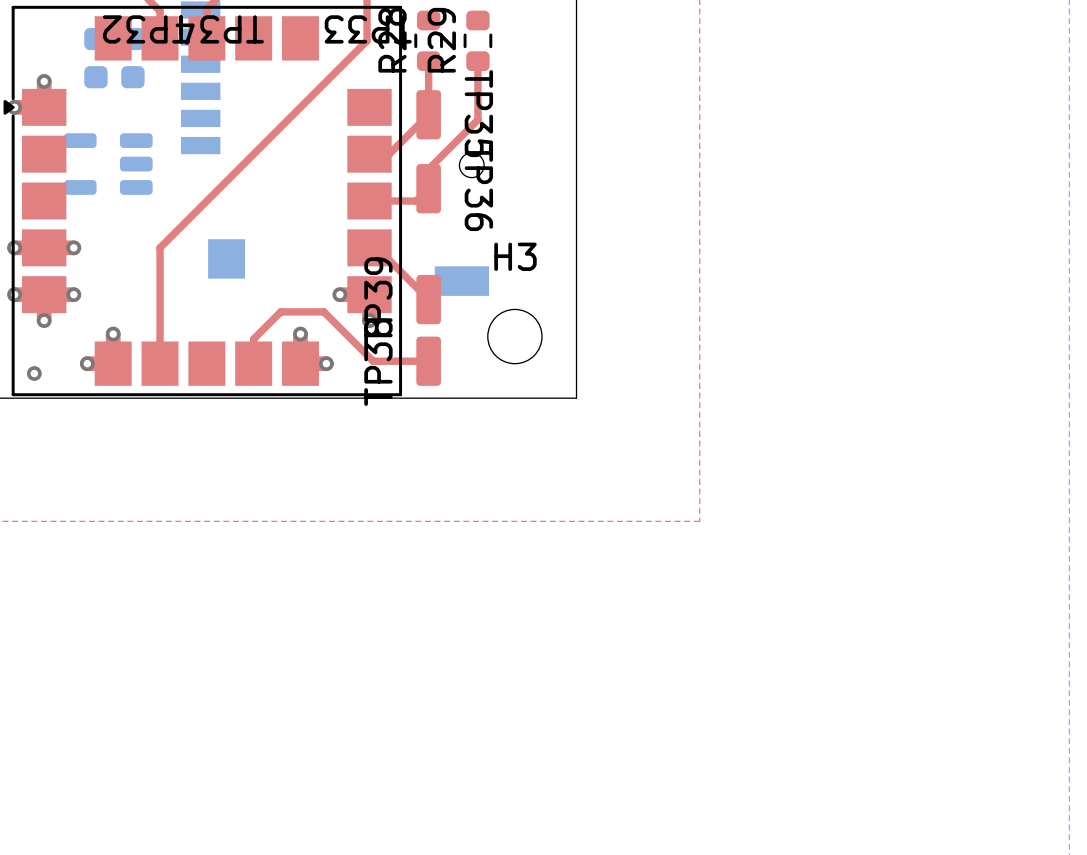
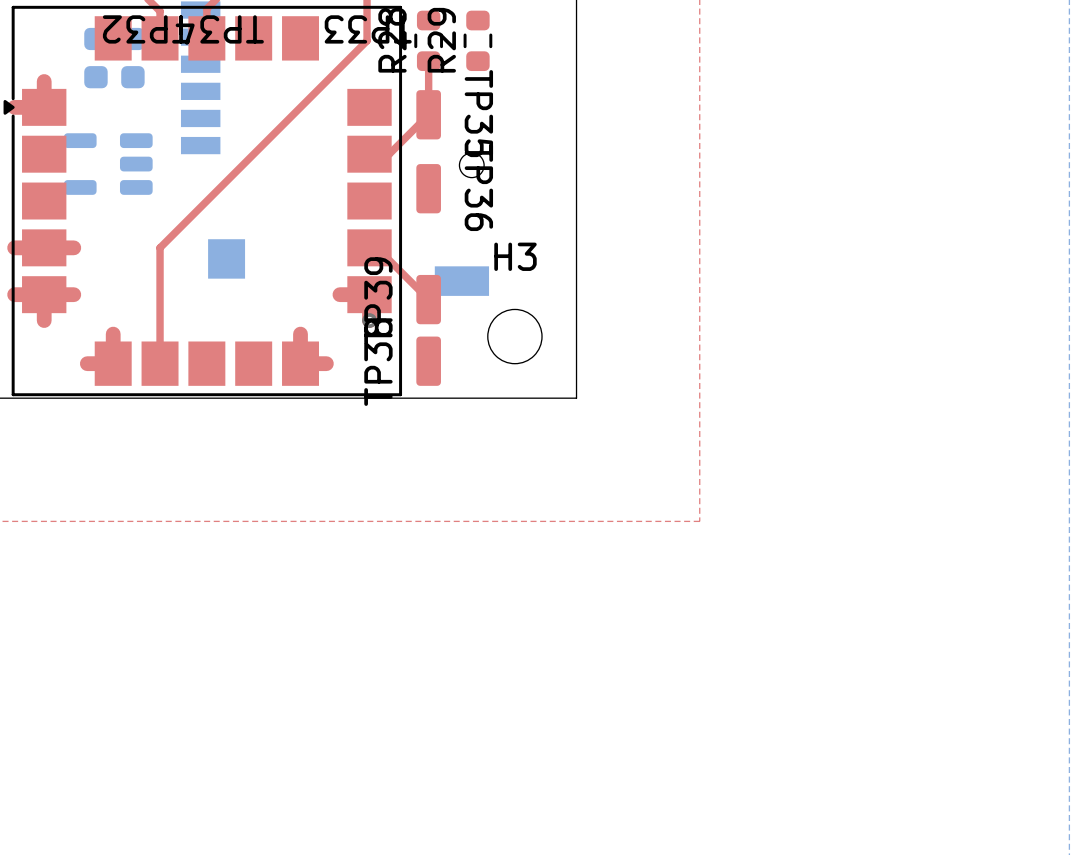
top track: (477, 61) (477, 119) (428, 169) (428, 188) (416, 201) (369, 201) -> none
via: (44, 81) -> none
via: (14, 107) -> none
via: (14, 247) -> none
via: (73, 247) -> none
via: (14, 294) -> none
via: (73, 294) -> none
via: (339, 294) -> none
via: (44, 320) -> none
via: (113, 334) -> none
via: (300, 334) -> none
top track: (428, 361) (373, 361) (323, 311) (280, 311) (253, 339) (253, 363) -> none
via: (87, 363) -> none
via: (326, 363) -> none
via: (34, 373) -> none

